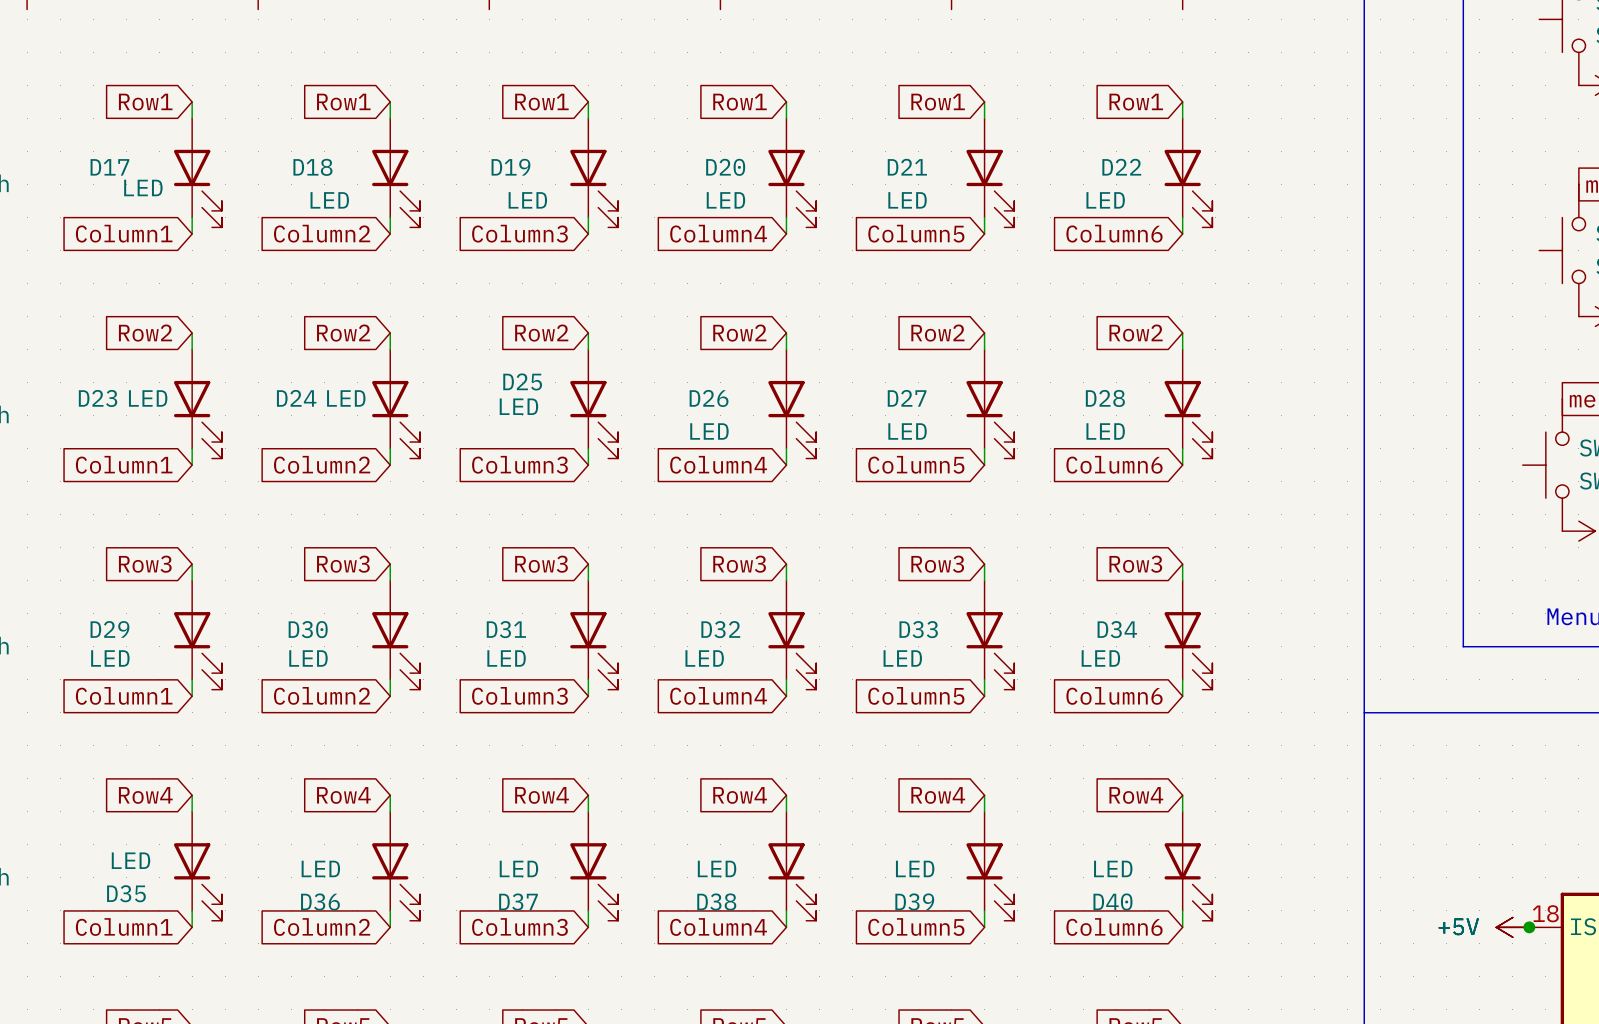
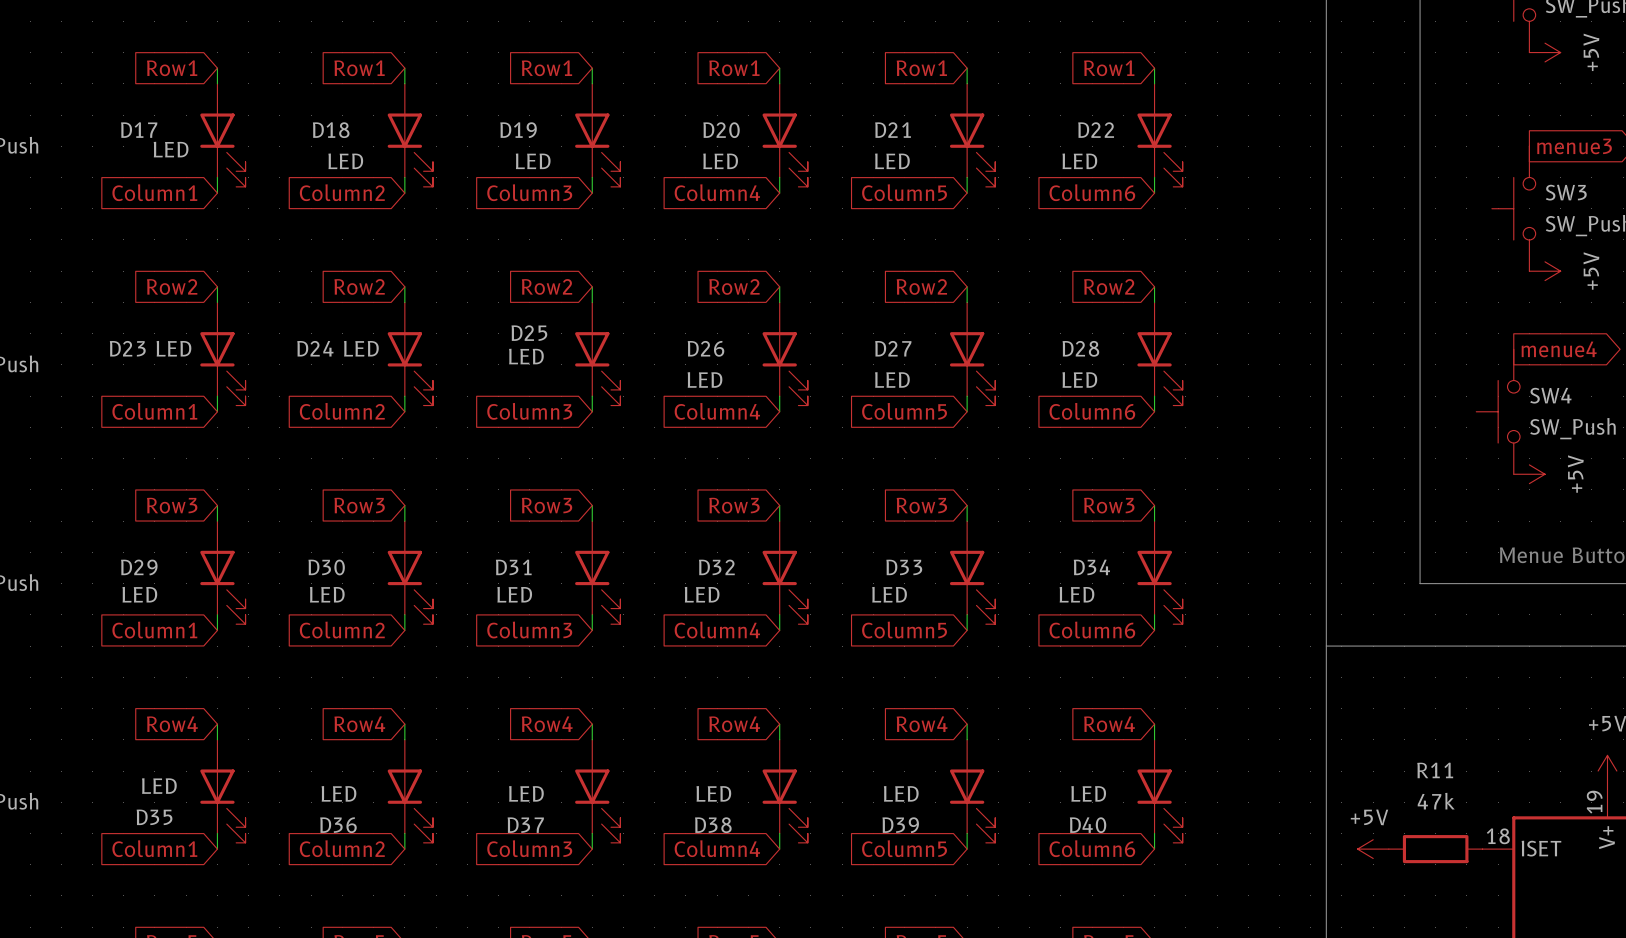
power symbol text position: +5V (1458, 926) -> +5V (1369, 817)
R11: none -> 47k (1435, 849)
power symbol position: +5V (1512, 927) -> +5V (1373, 849)
junction: (1529, 927) -> none

